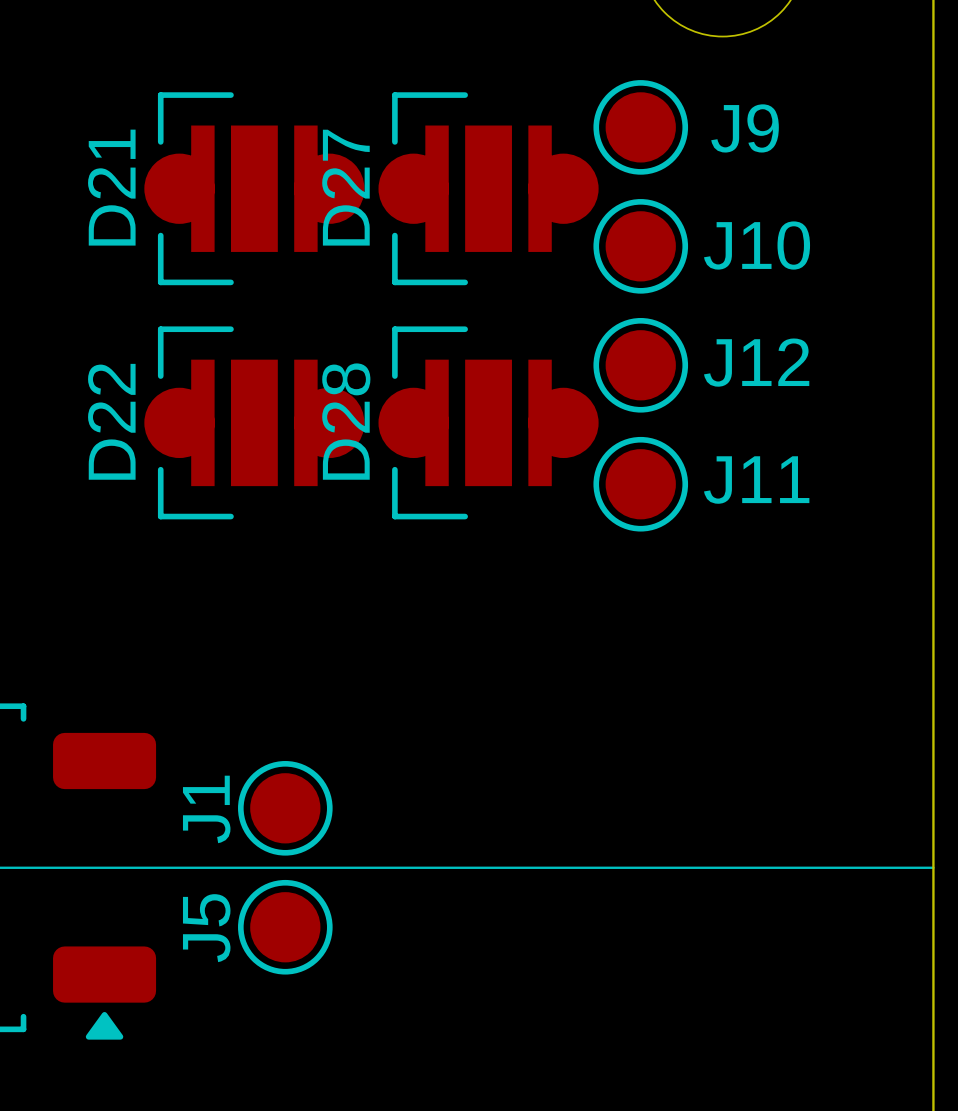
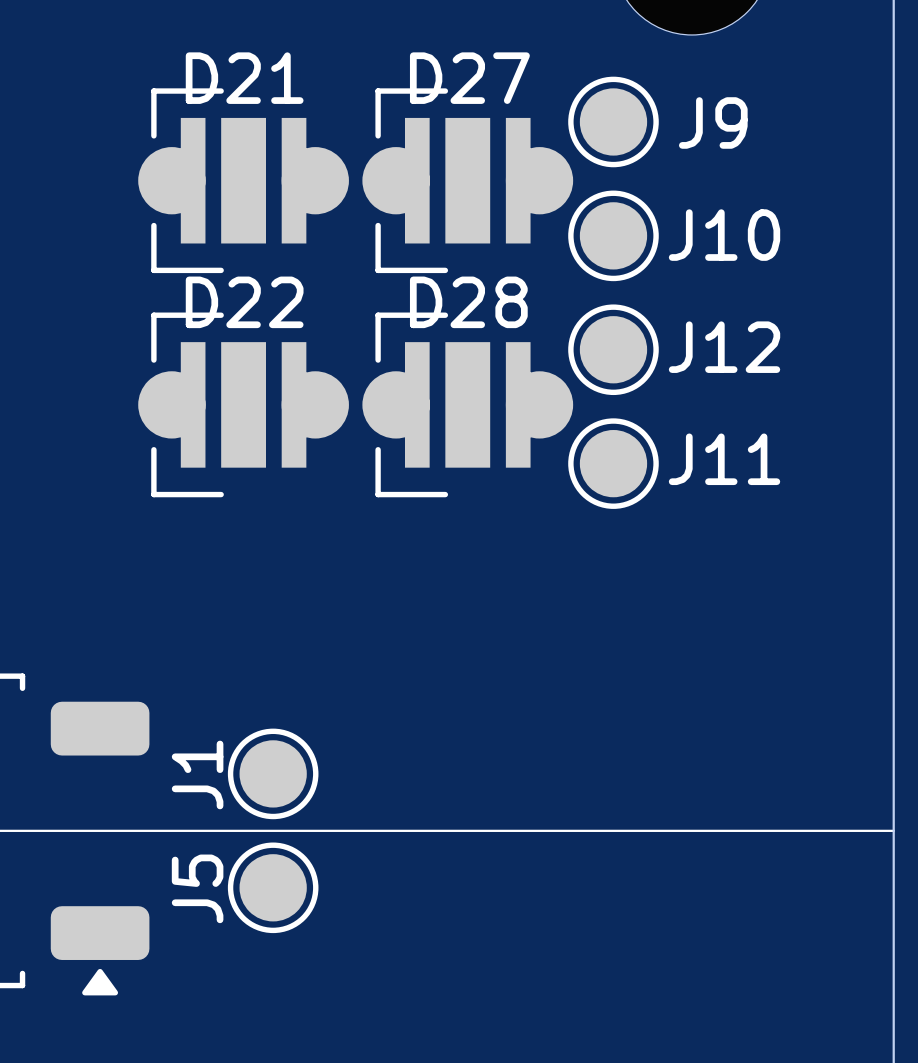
D21 footprint: [144, 92, 365, 286] -> [138, 88, 349, 274]
D27 footprint: [378, 92, 599, 286] -> [362, 88, 574, 274]
D21 name rotation: 0° (111, 187) -> 90° clockwise (244, 78)
D21 name position: D21 (111, 187) -> D21 (244, 78)
D27 name rotation: 0° (345, 187) -> 90° clockwise (469, 78)
D27 name position: D27 (345, 187) -> D27 (469, 78)
D22 footprint: [144, 326, 365, 520] -> [138, 312, 349, 498]
D28 footprint: [378, 326, 599, 520] -> [362, 312, 574, 498]
D22 name rotation: 0° (111, 421) -> 90° clockwise (244, 302)
D22 name position: D22 (111, 421) -> D22 (244, 302)
D28 name rotation: 0° (346, 421) -> 90° clockwise (468, 302)
D28 name position: D28 (346, 421) -> D28 (468, 302)

